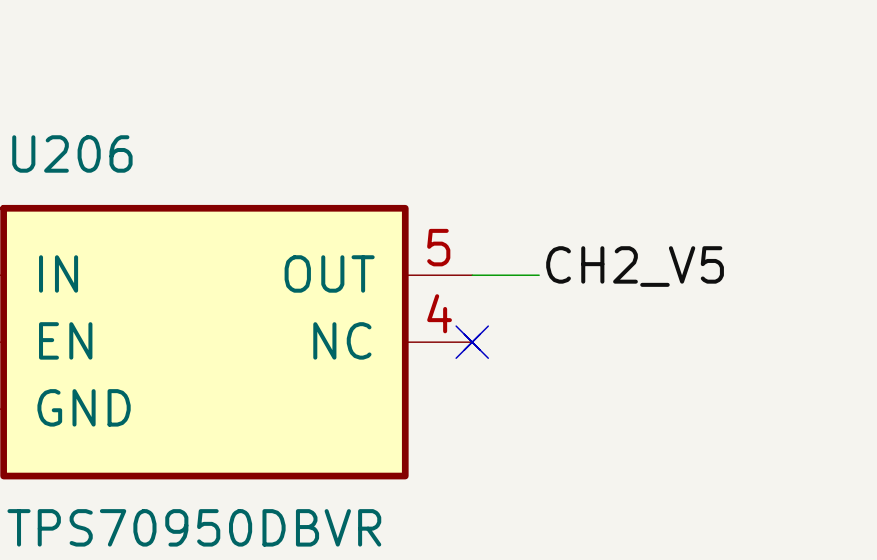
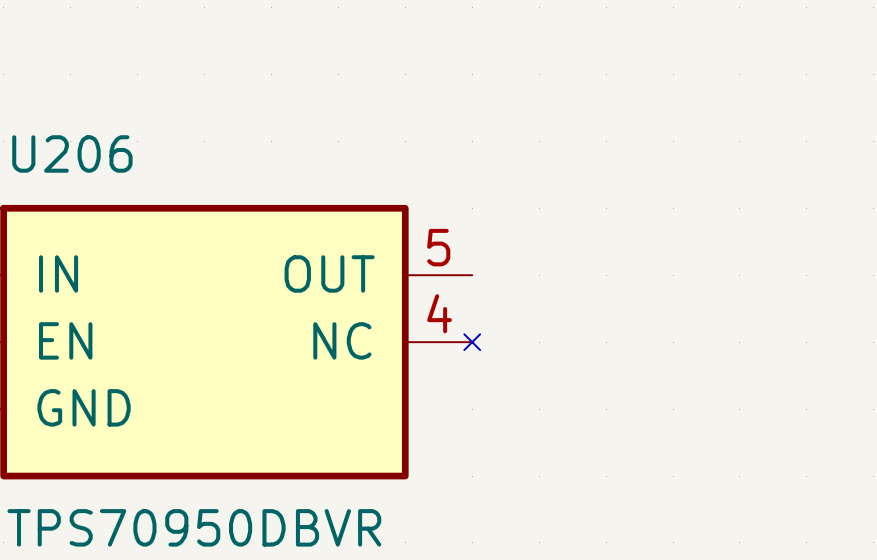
label: CH2_V5 (635, 266) -> none
wire: (472, 275) (539, 275) -> none
no-connect mark: (472, 342) -> none

